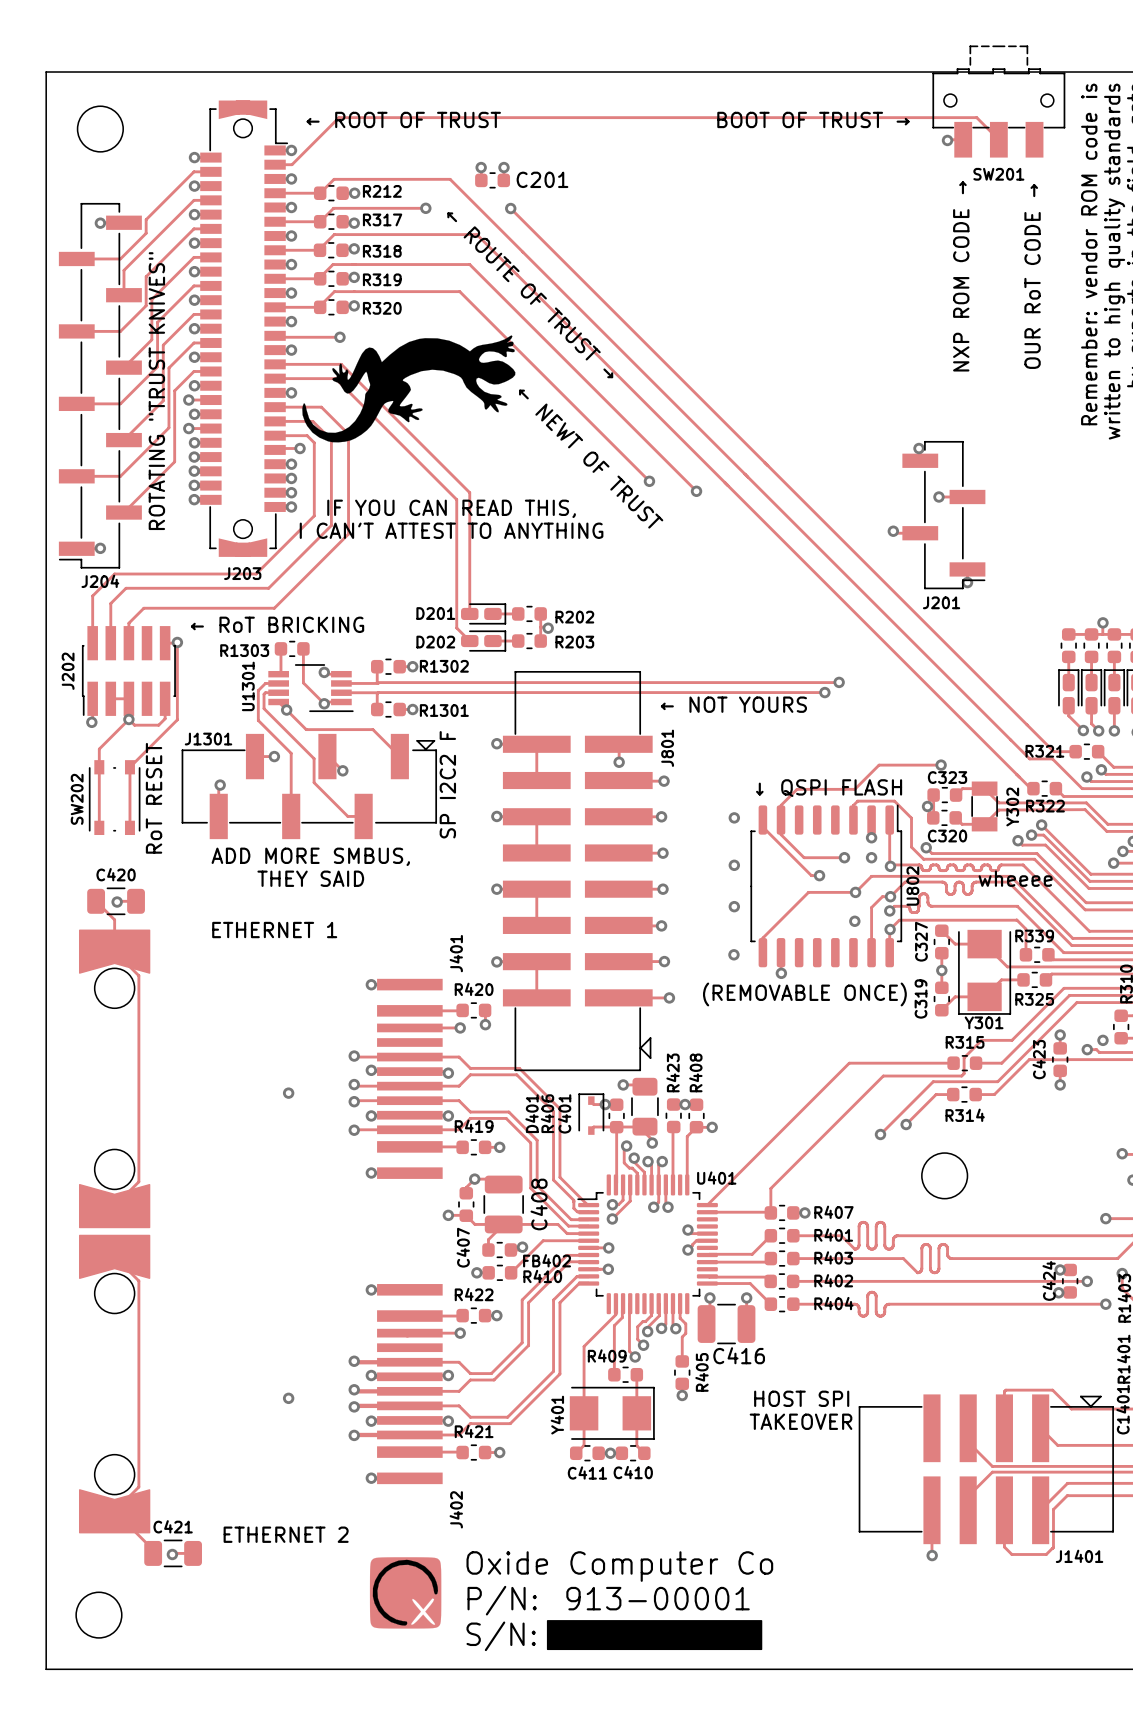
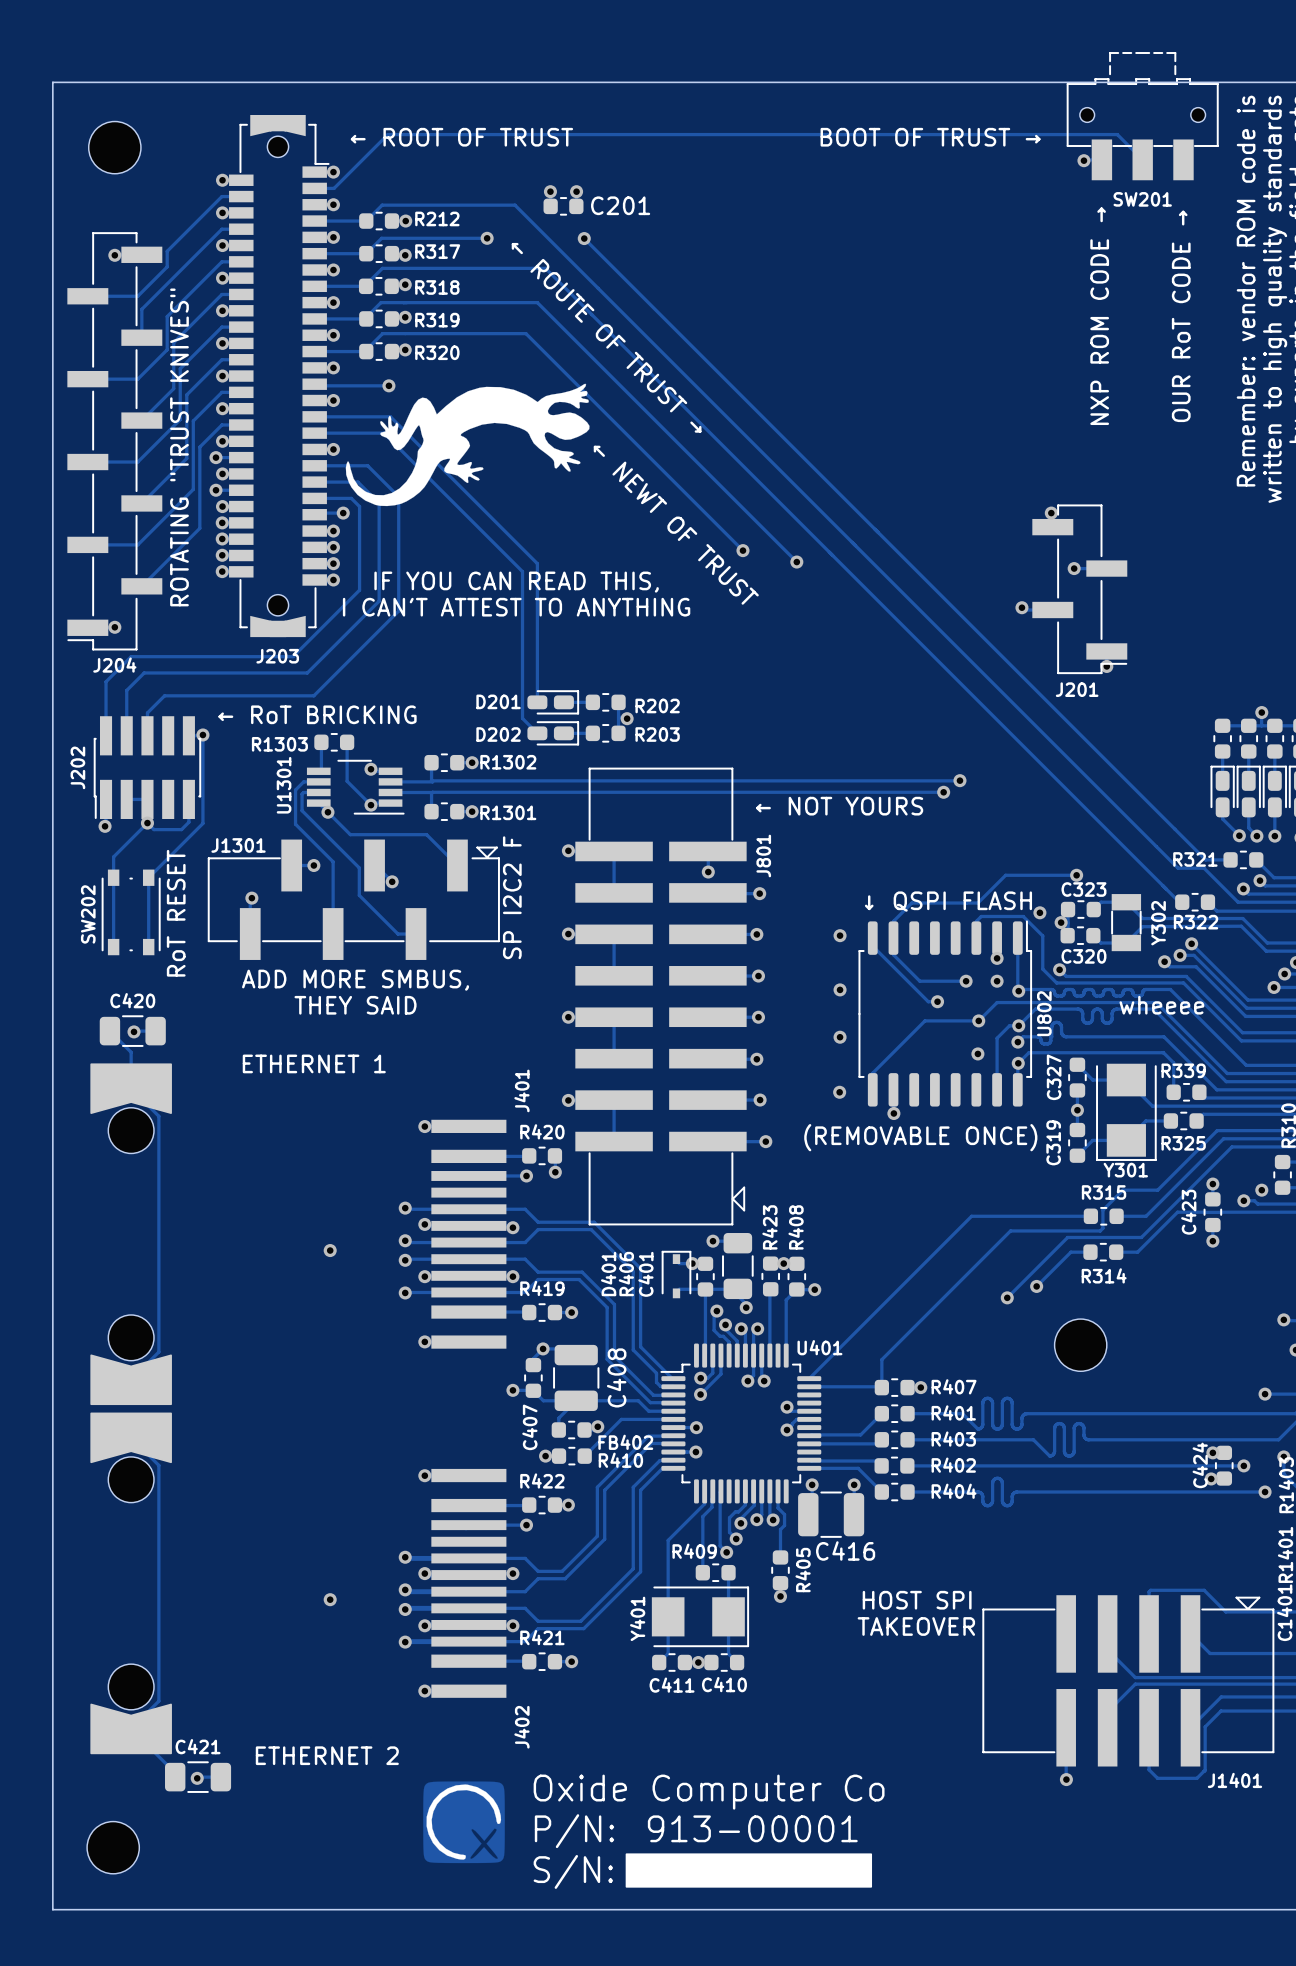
via: none -> (1039, 912)

